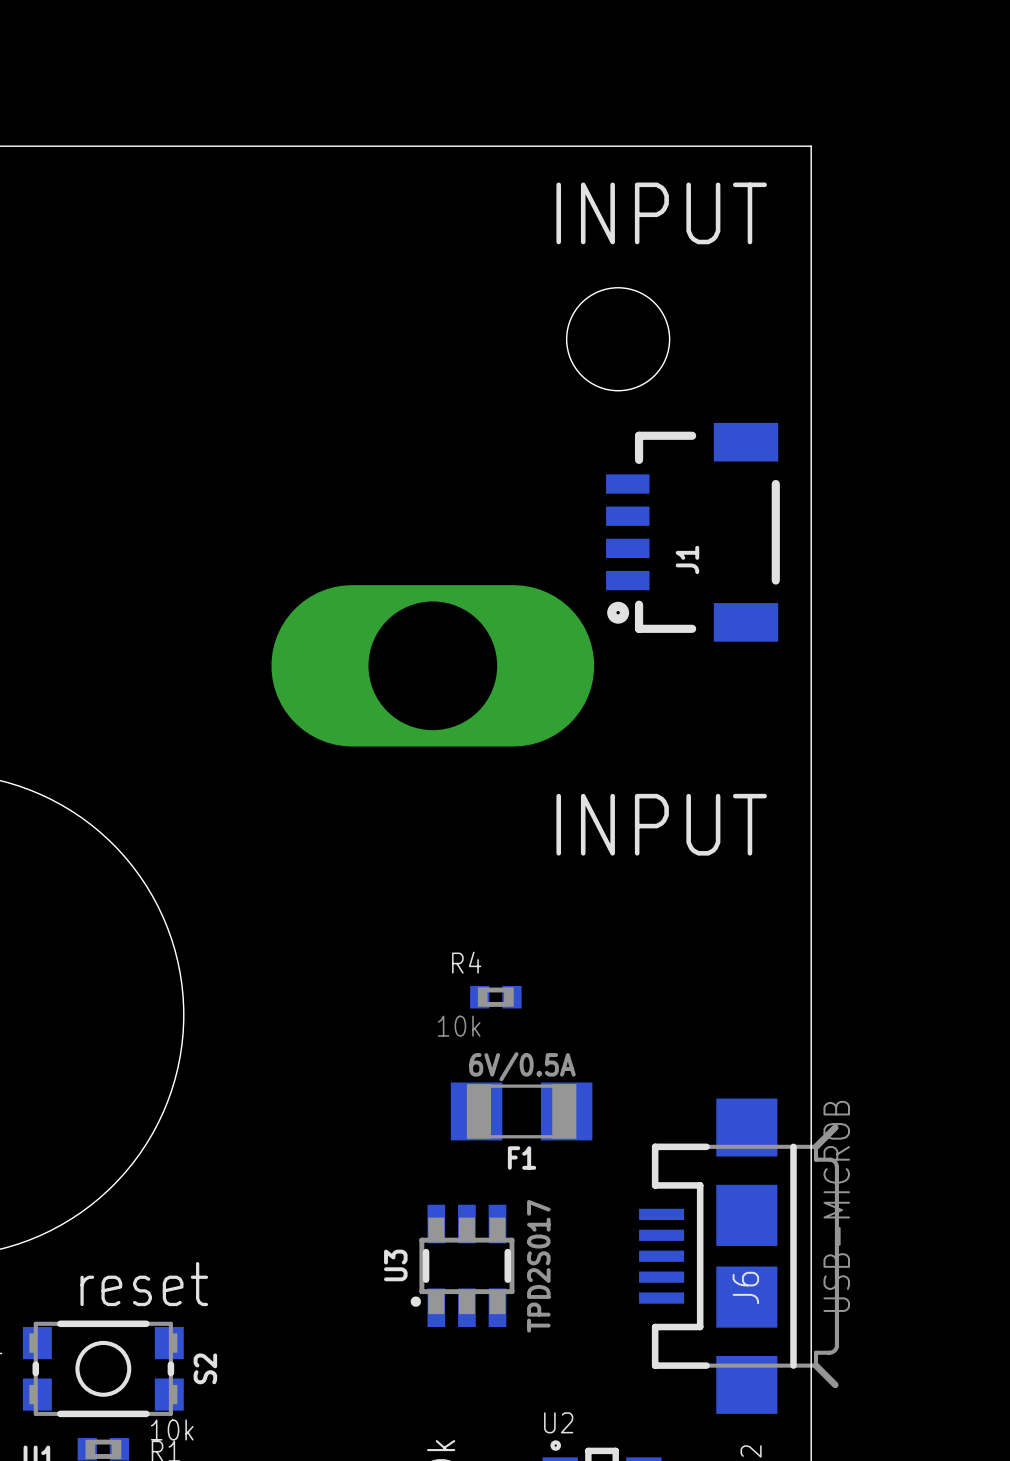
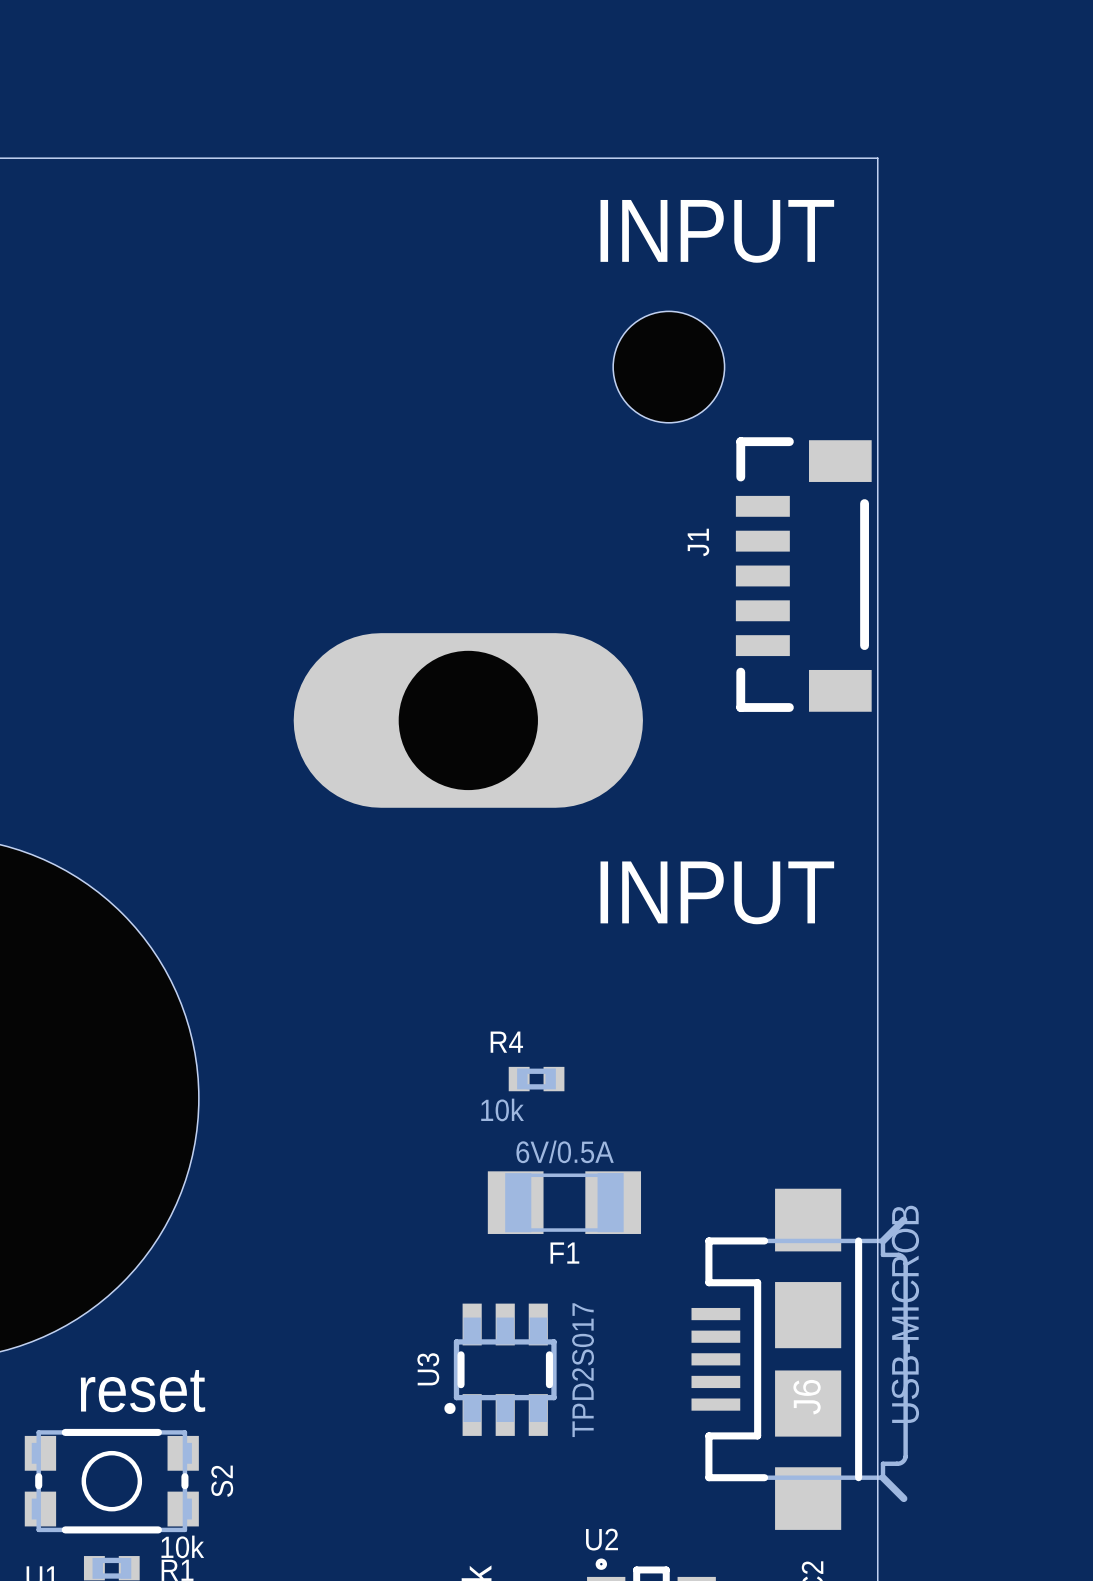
J1 footprint: [606, 422, 780, 642] -> [709, 437, 872, 718]
J1 name position: J1 (687, 559) -> J1 (698, 542)

